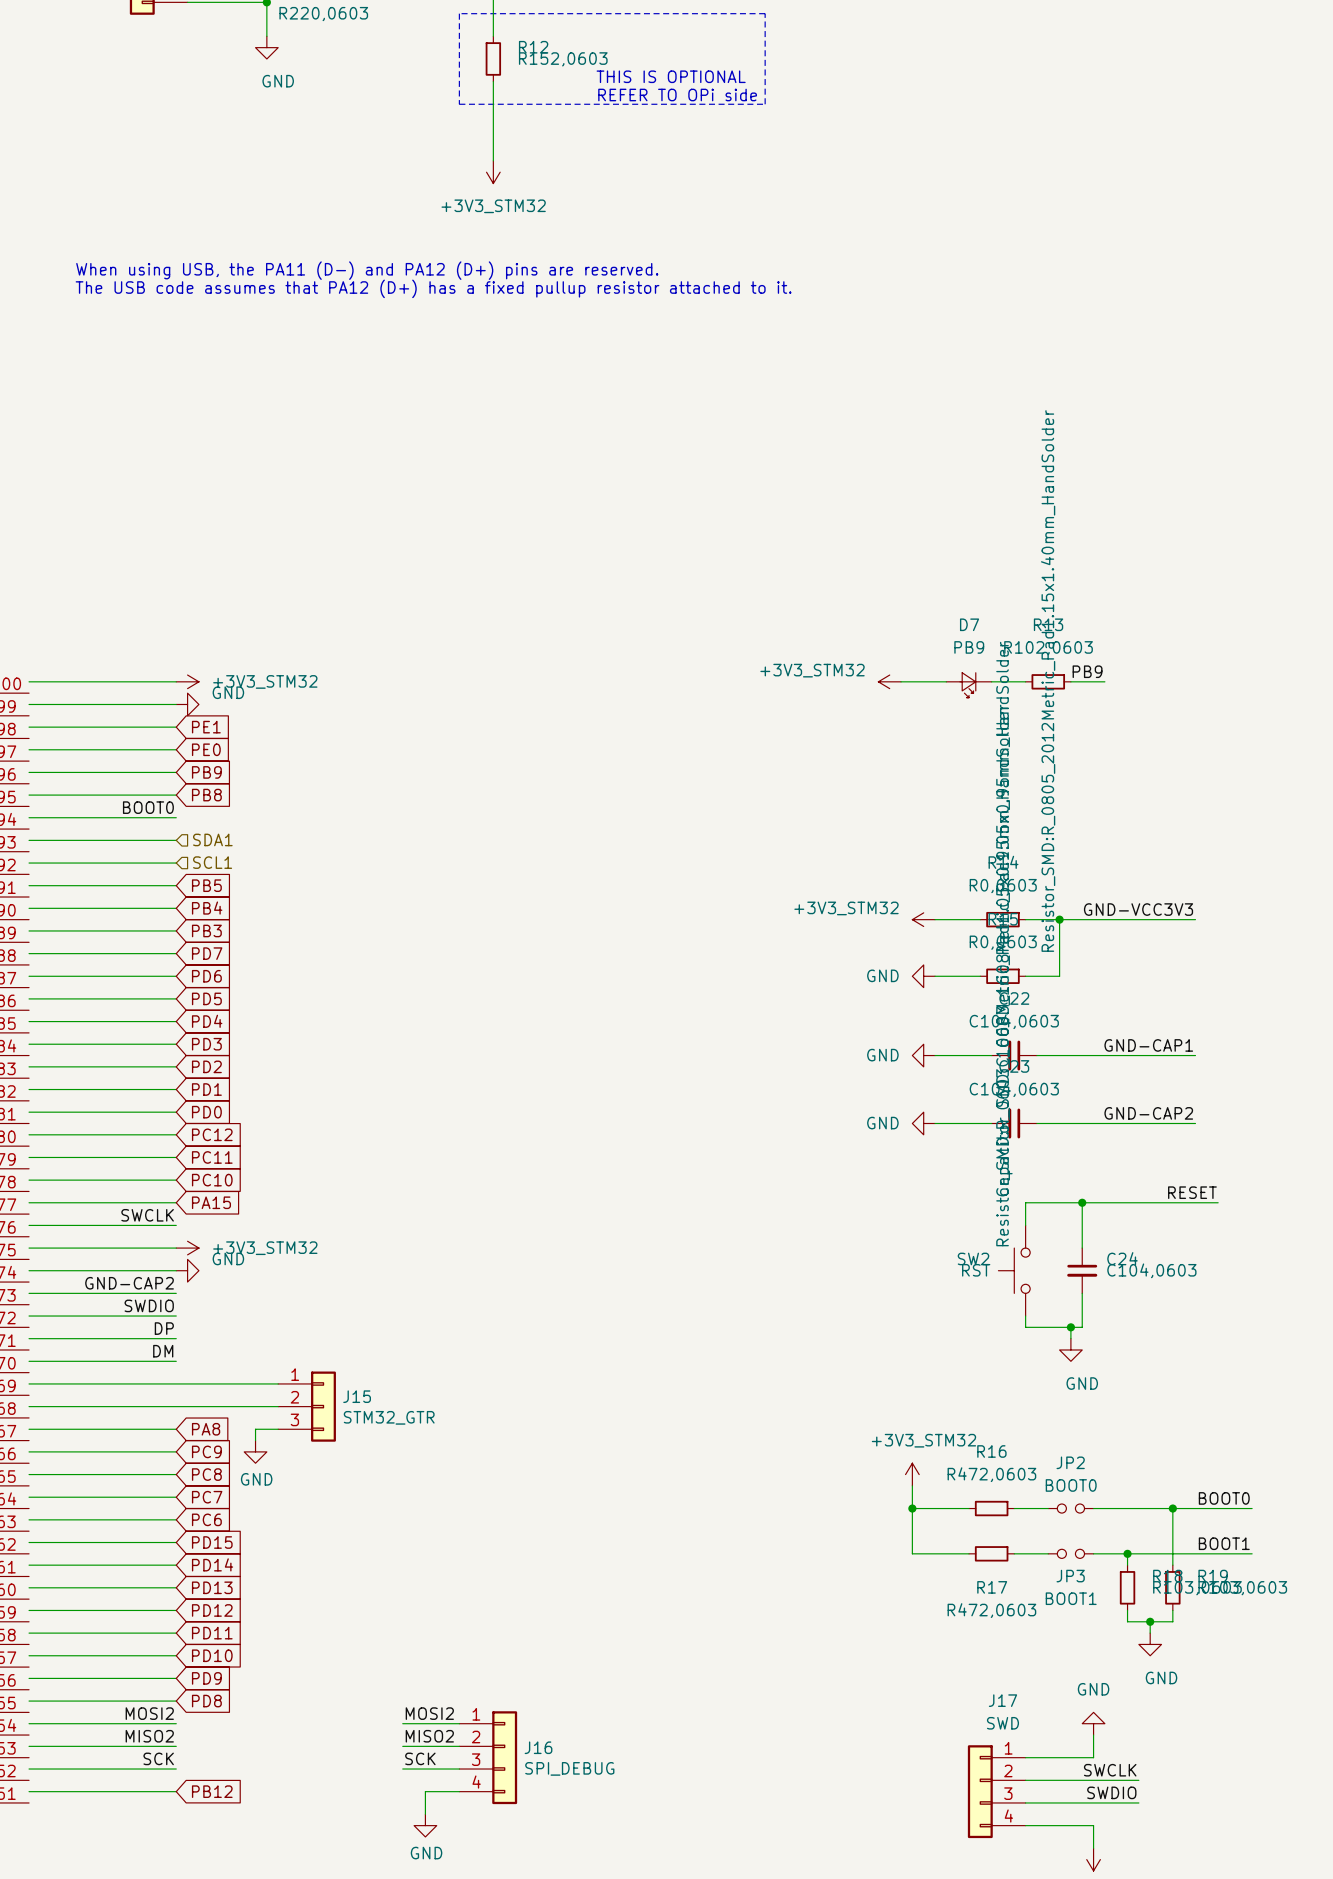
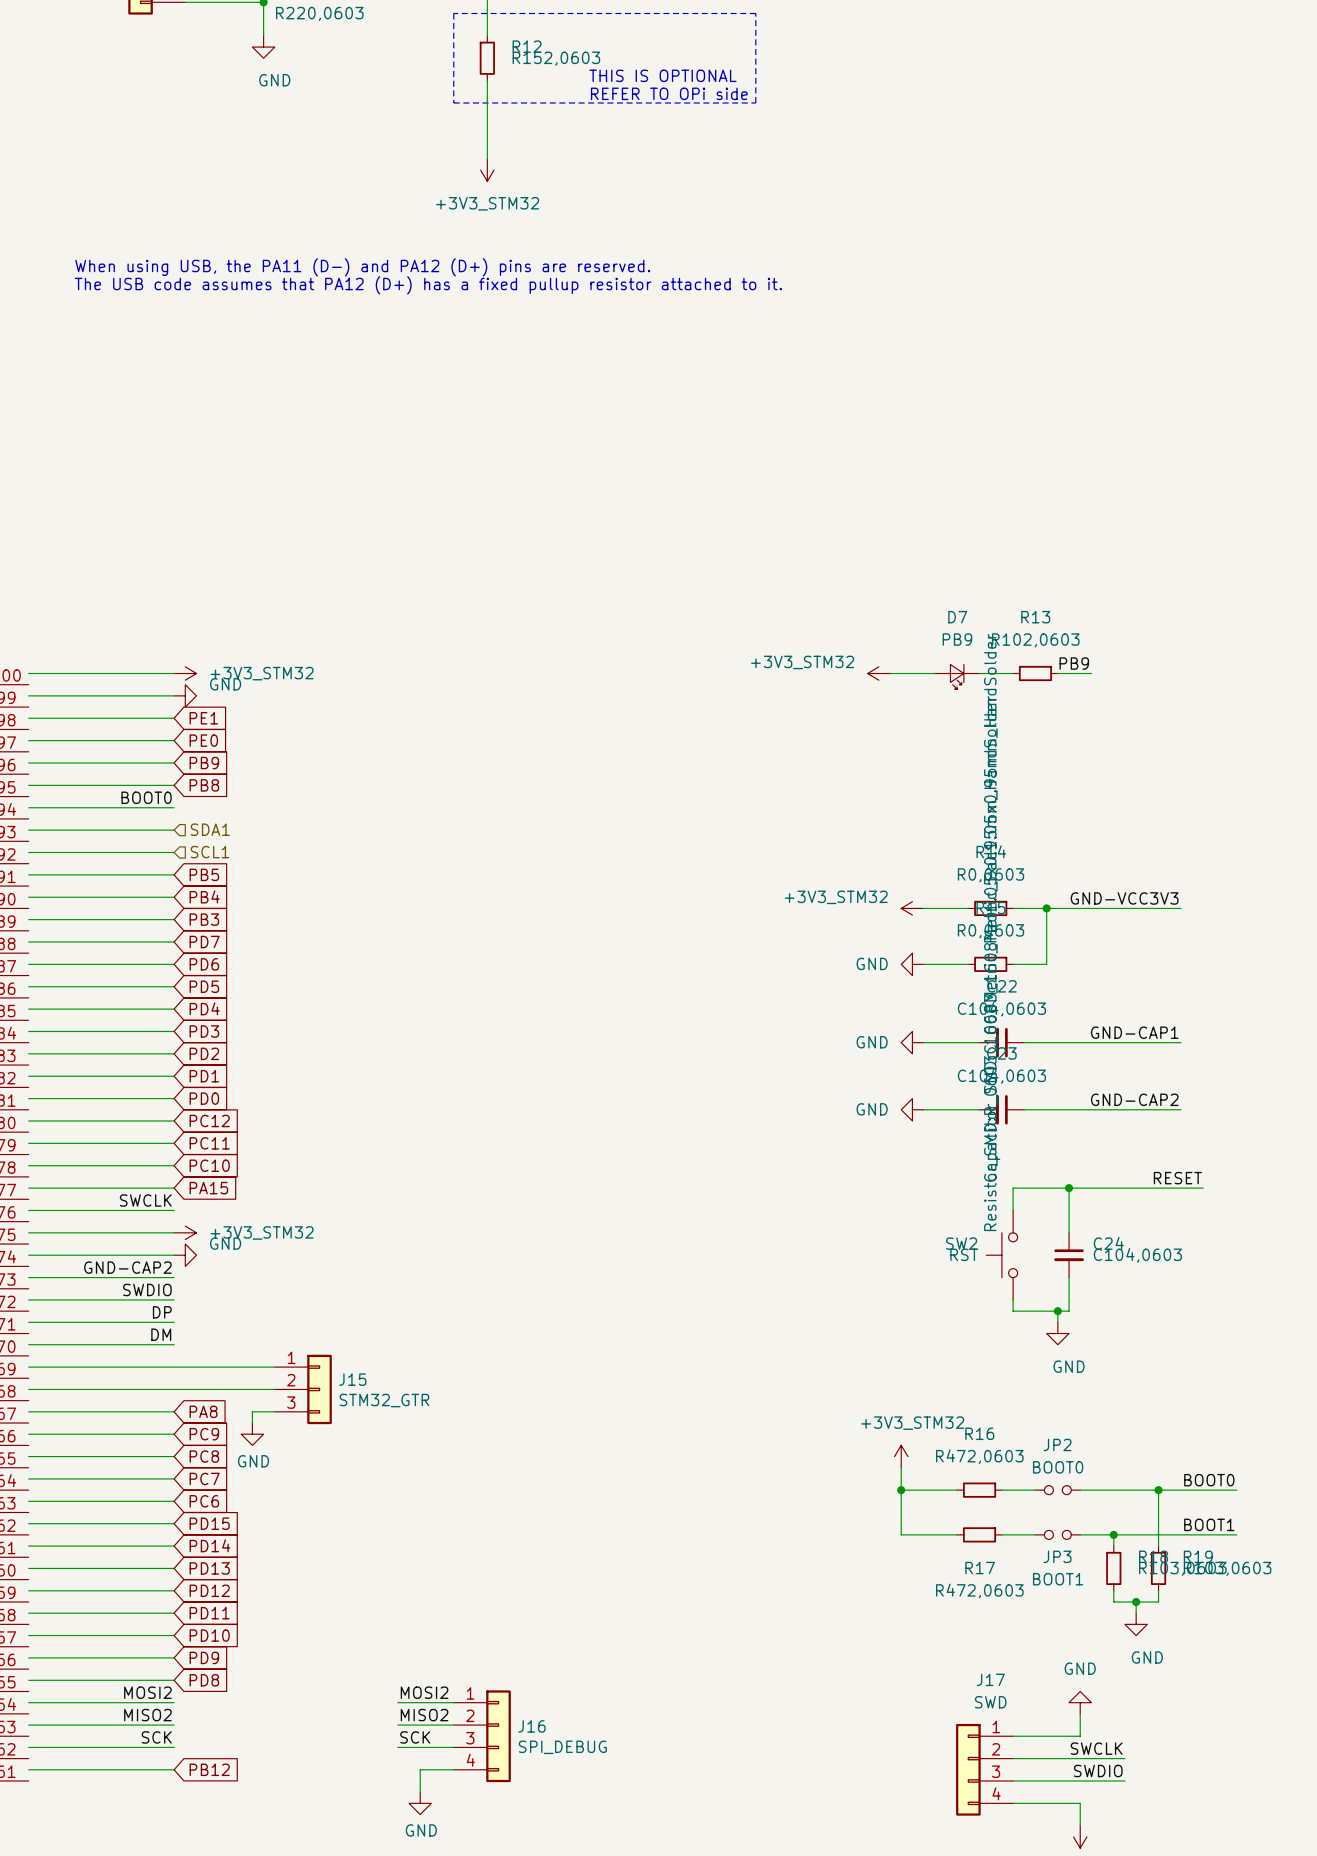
R13 text: Resistor_SMD:R_0805_2012Metric_Pad1.15x1.40mm_HandSolder (1048, 681) -> none

